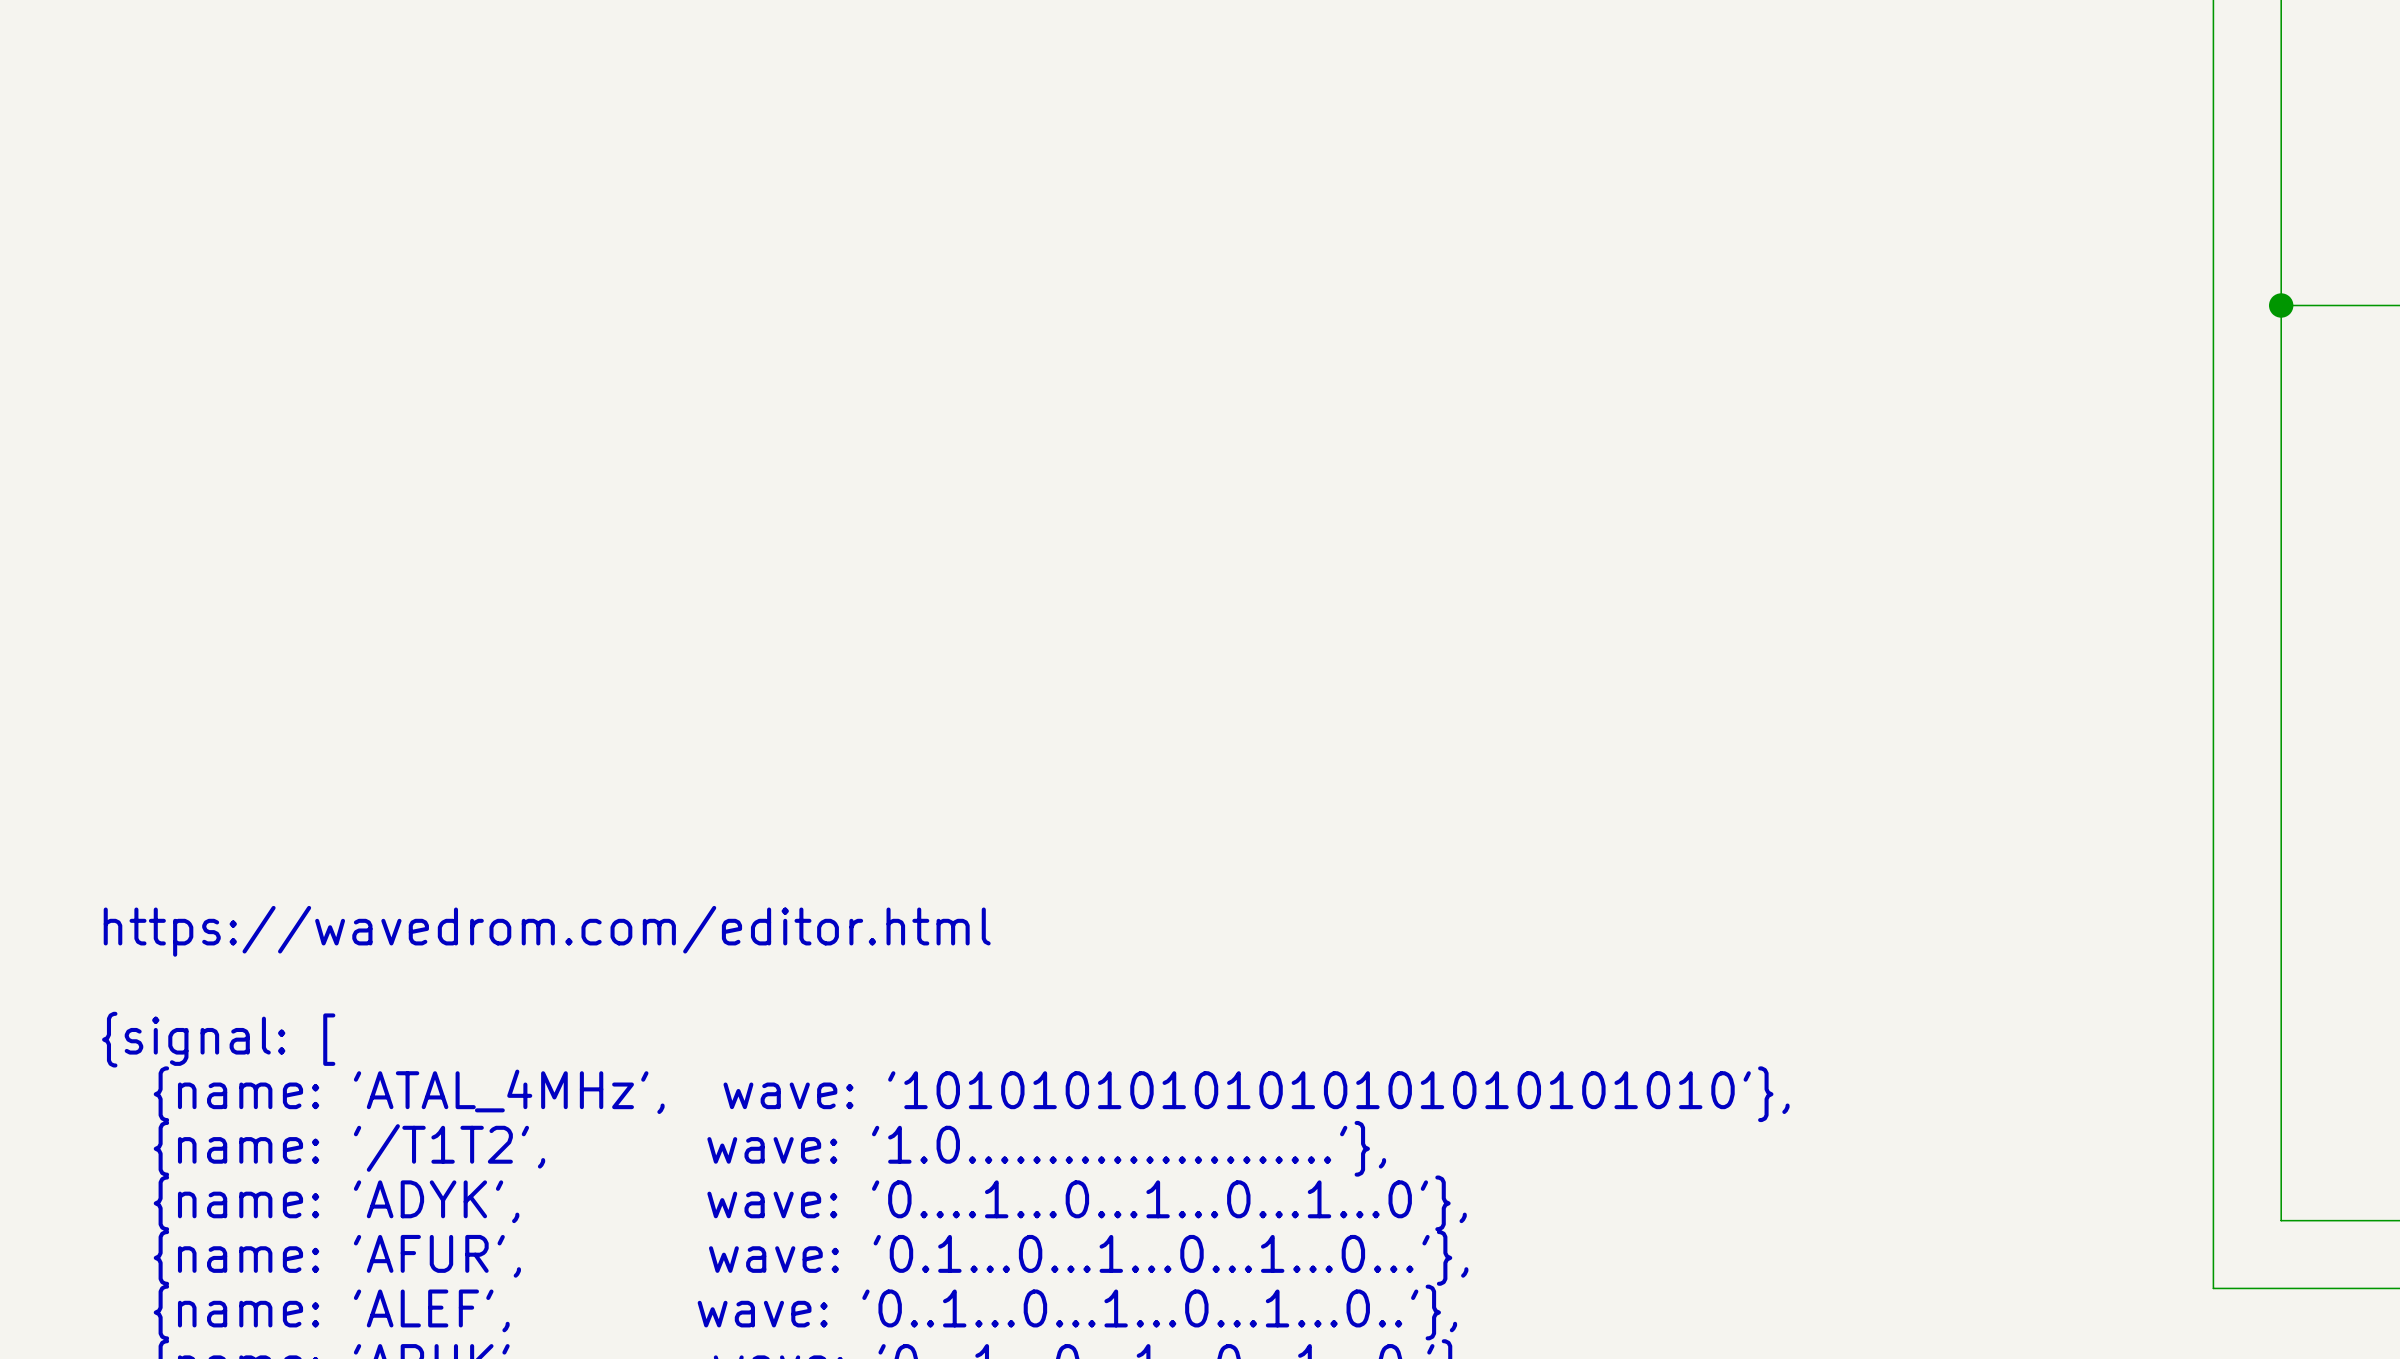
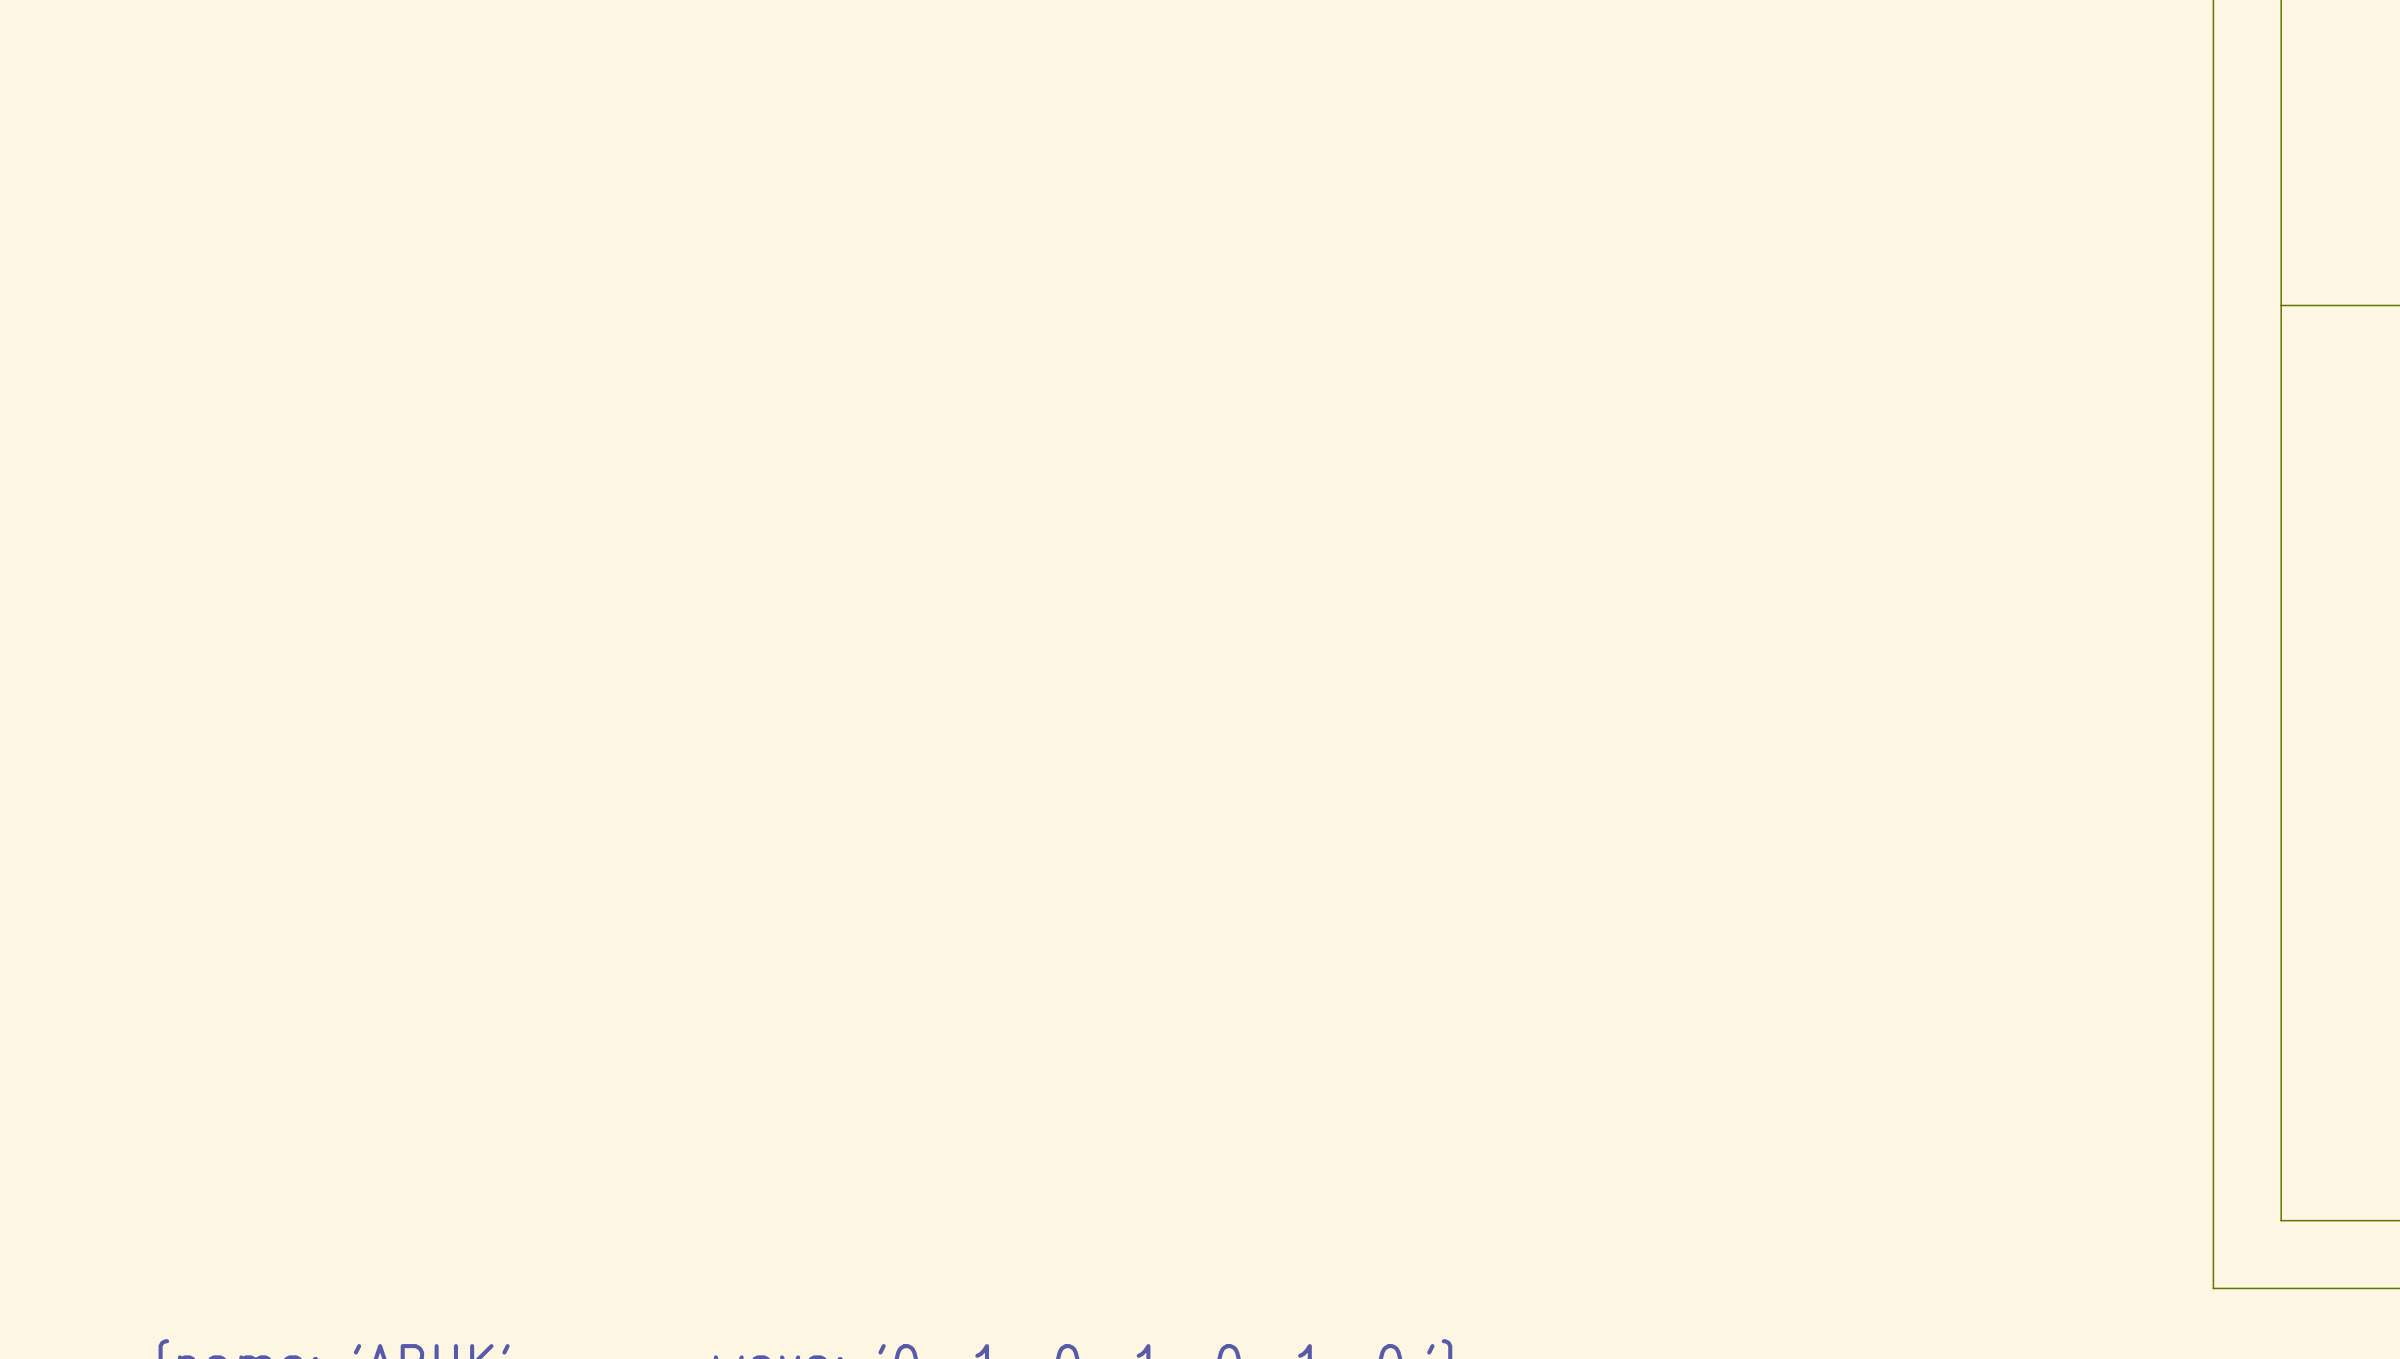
junction: (2281, 305) -> none
text: https://wavedrom.com/editor.html (547, 931) -> none
text: {signal: [ (218, 1039) -> none
text: {name: 'ATAL_4MHz', wave: '10101010101010101010101010'}, (971, 1094) -> none
text: {name: '/T1T2', wave: '1.0.......................'}, (769, 1148) -> none
text: {name: 'ADYK', wave: '0....1...0...1...0...1...0'}, (810, 1203) -> none
text: {name: 'AFUR', wave: '0.1...0...1...0...1...0...'}, (811, 1257) -> none
text: {name: 'ALEF', wave: '0..1...0...1...0...1...0..'}, (805, 1312) -> none

